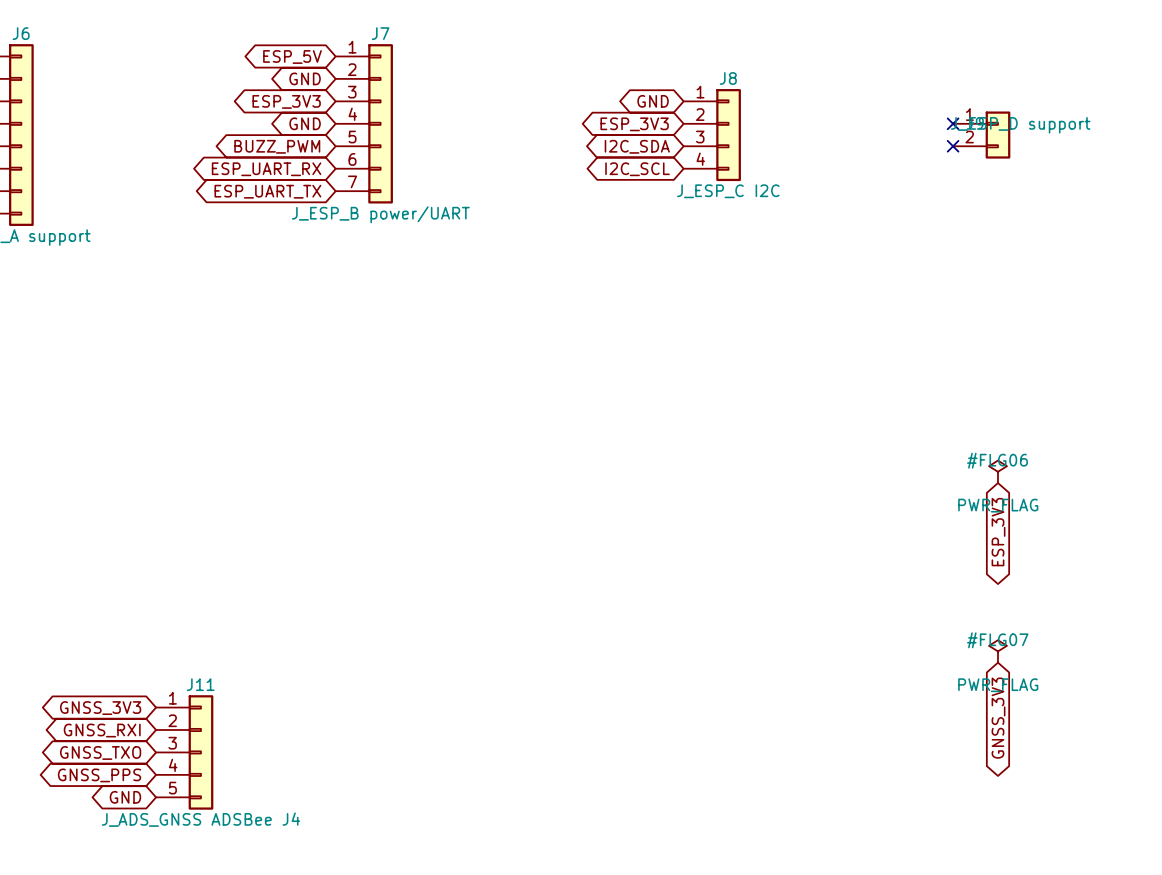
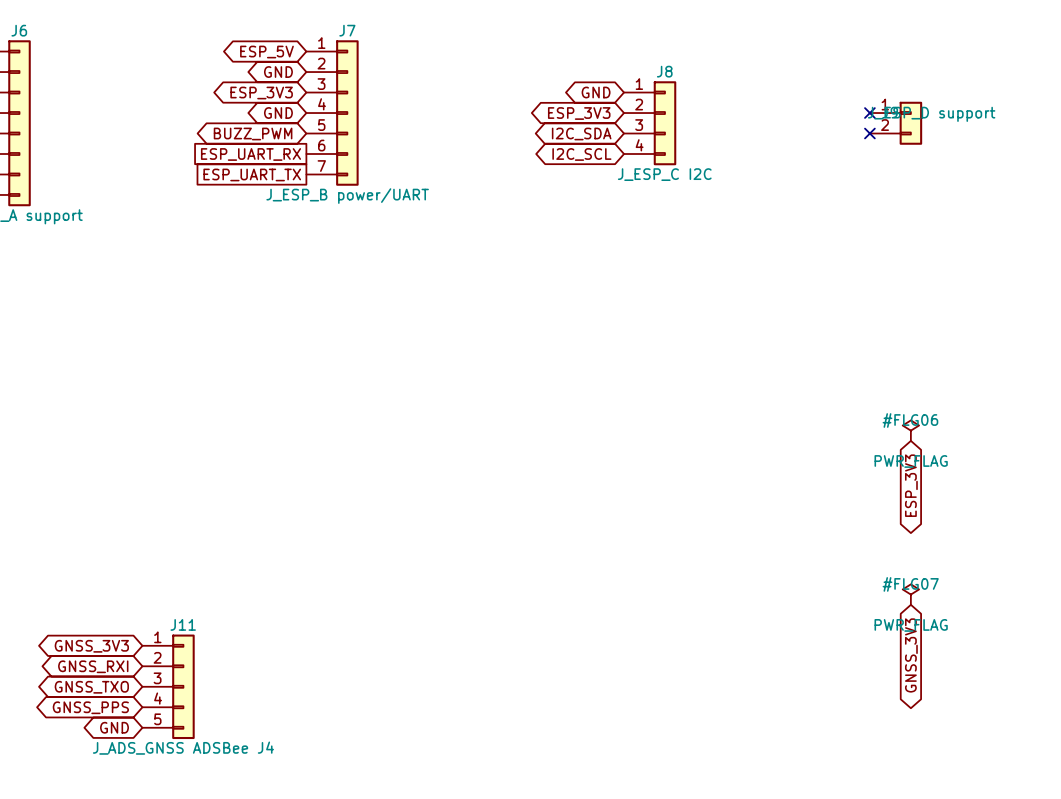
global label shape: bidirectional (266, 169) -> passive (251, 154)
global label shape: bidirectional (267, 191) -> passive (252, 174)

